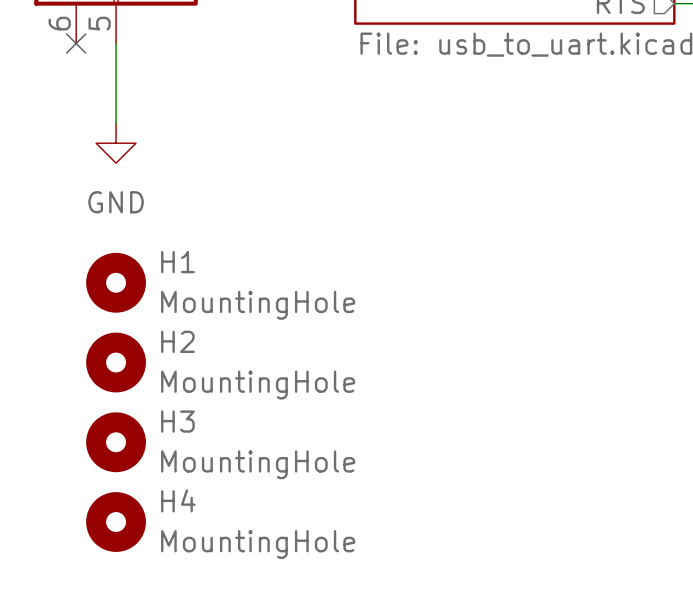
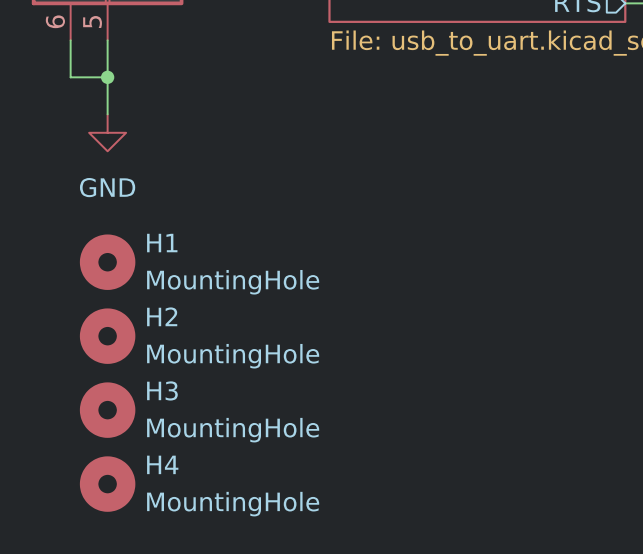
wire: none -> (70, 40) (70, 77) (107, 77)
no-connect mark: (76, 43) -> none
junction: none -> (107, 77)

